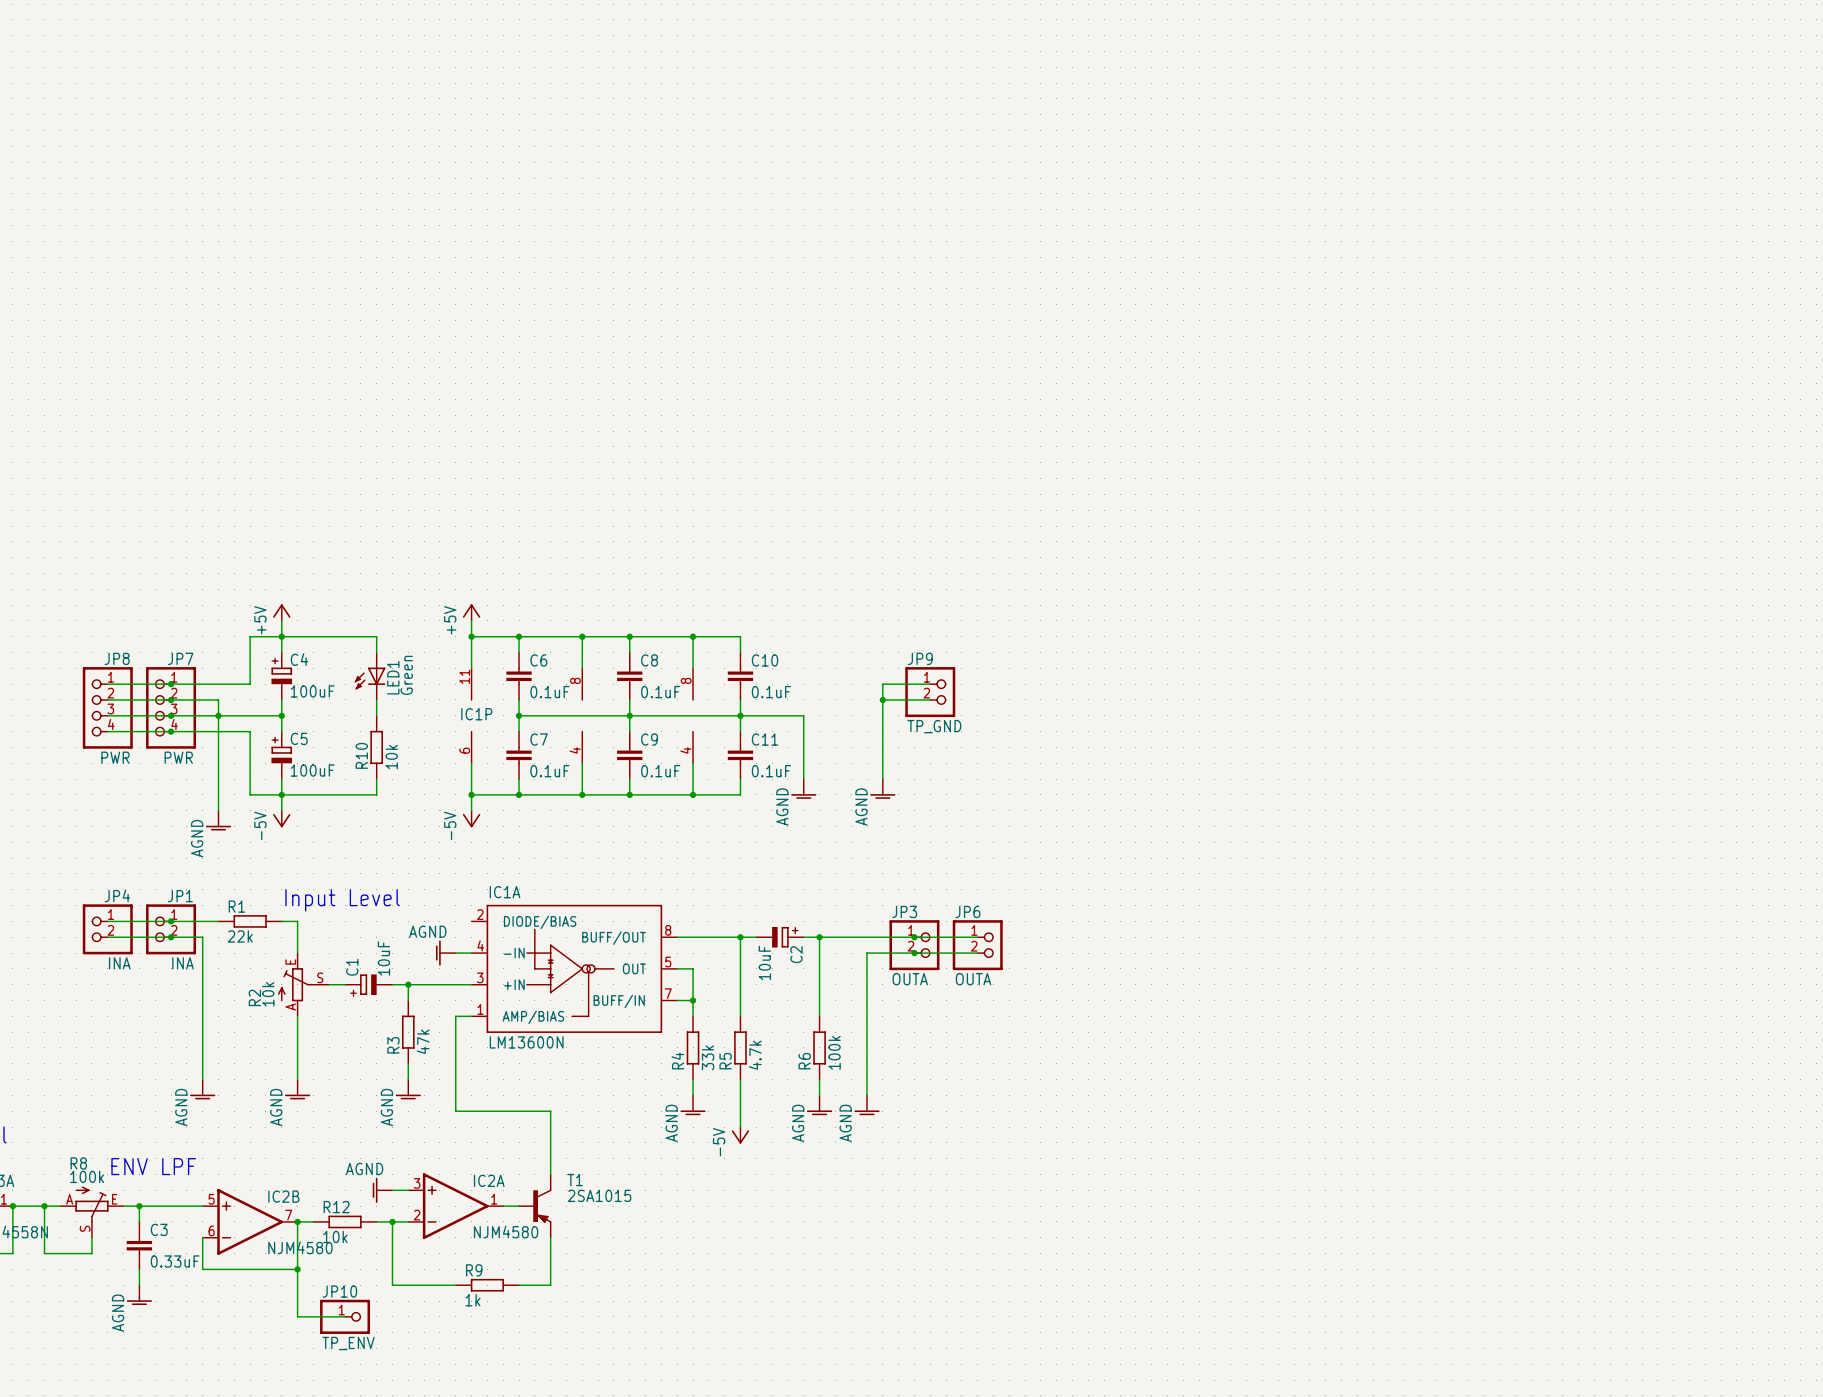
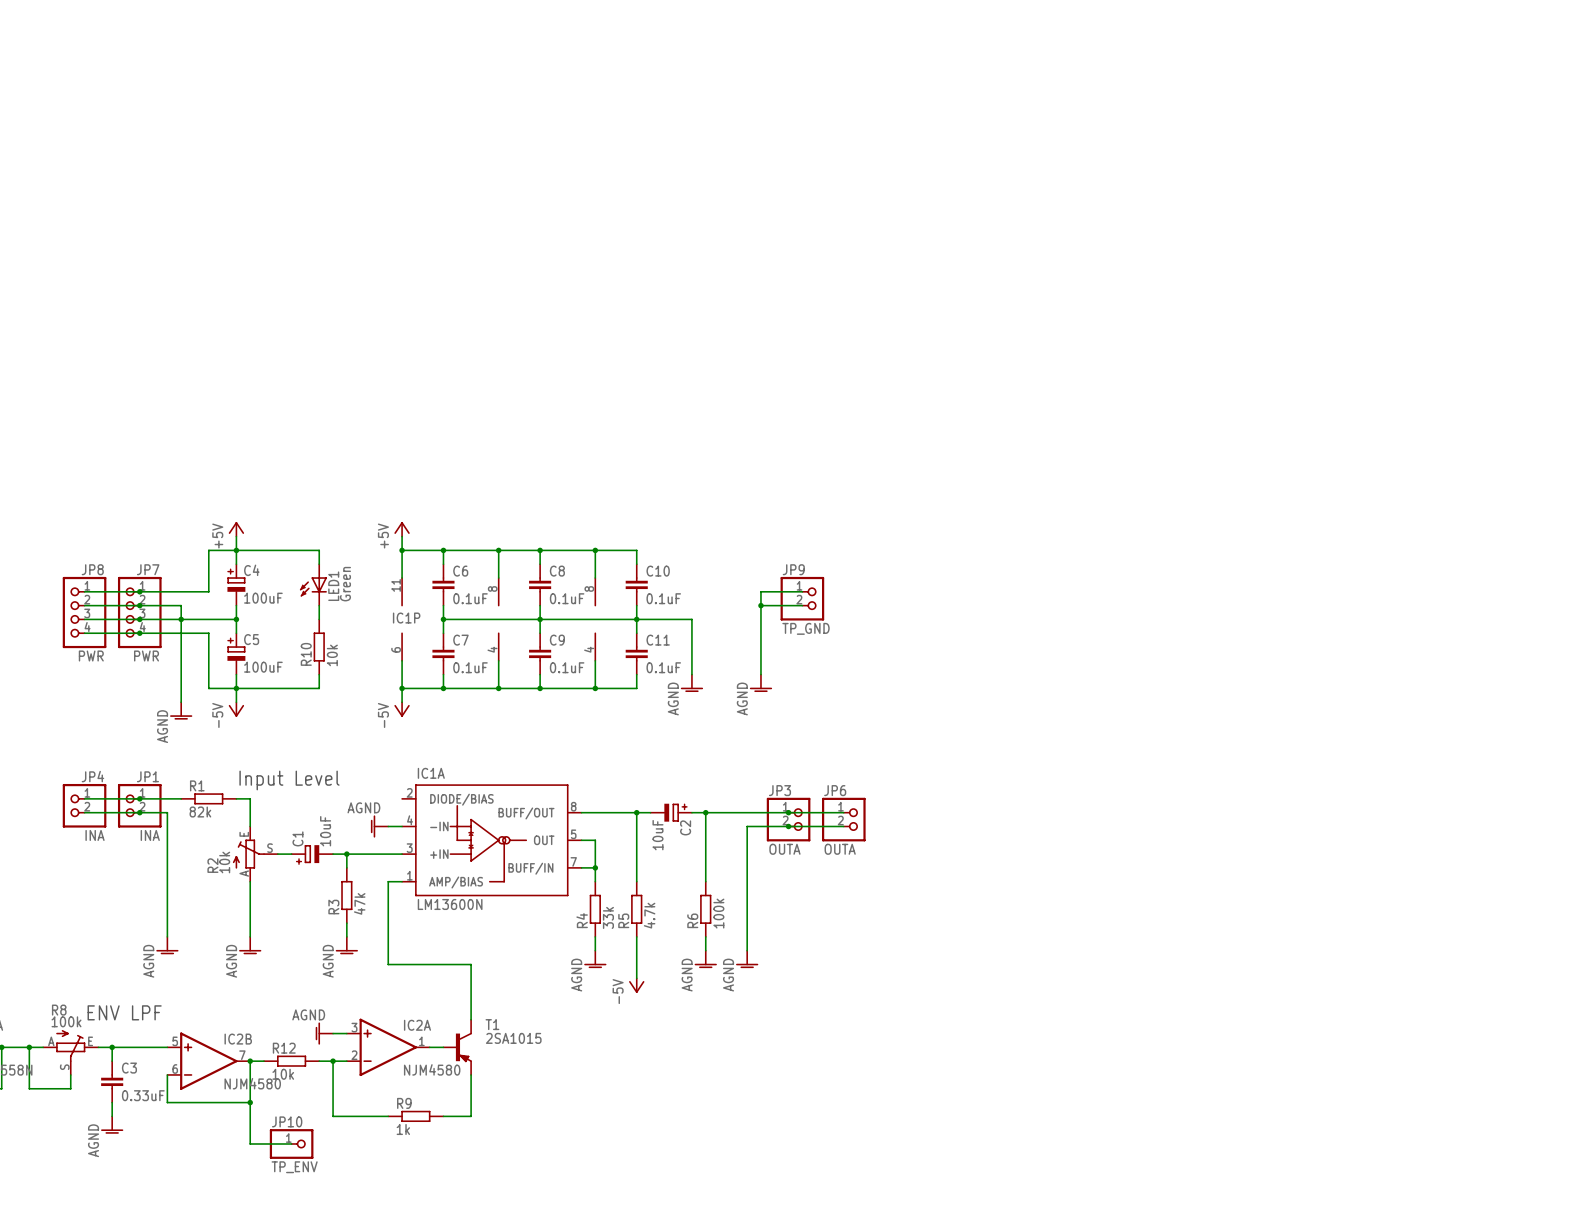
R1 value: 22k (240, 936) -> 82k (200, 812)

